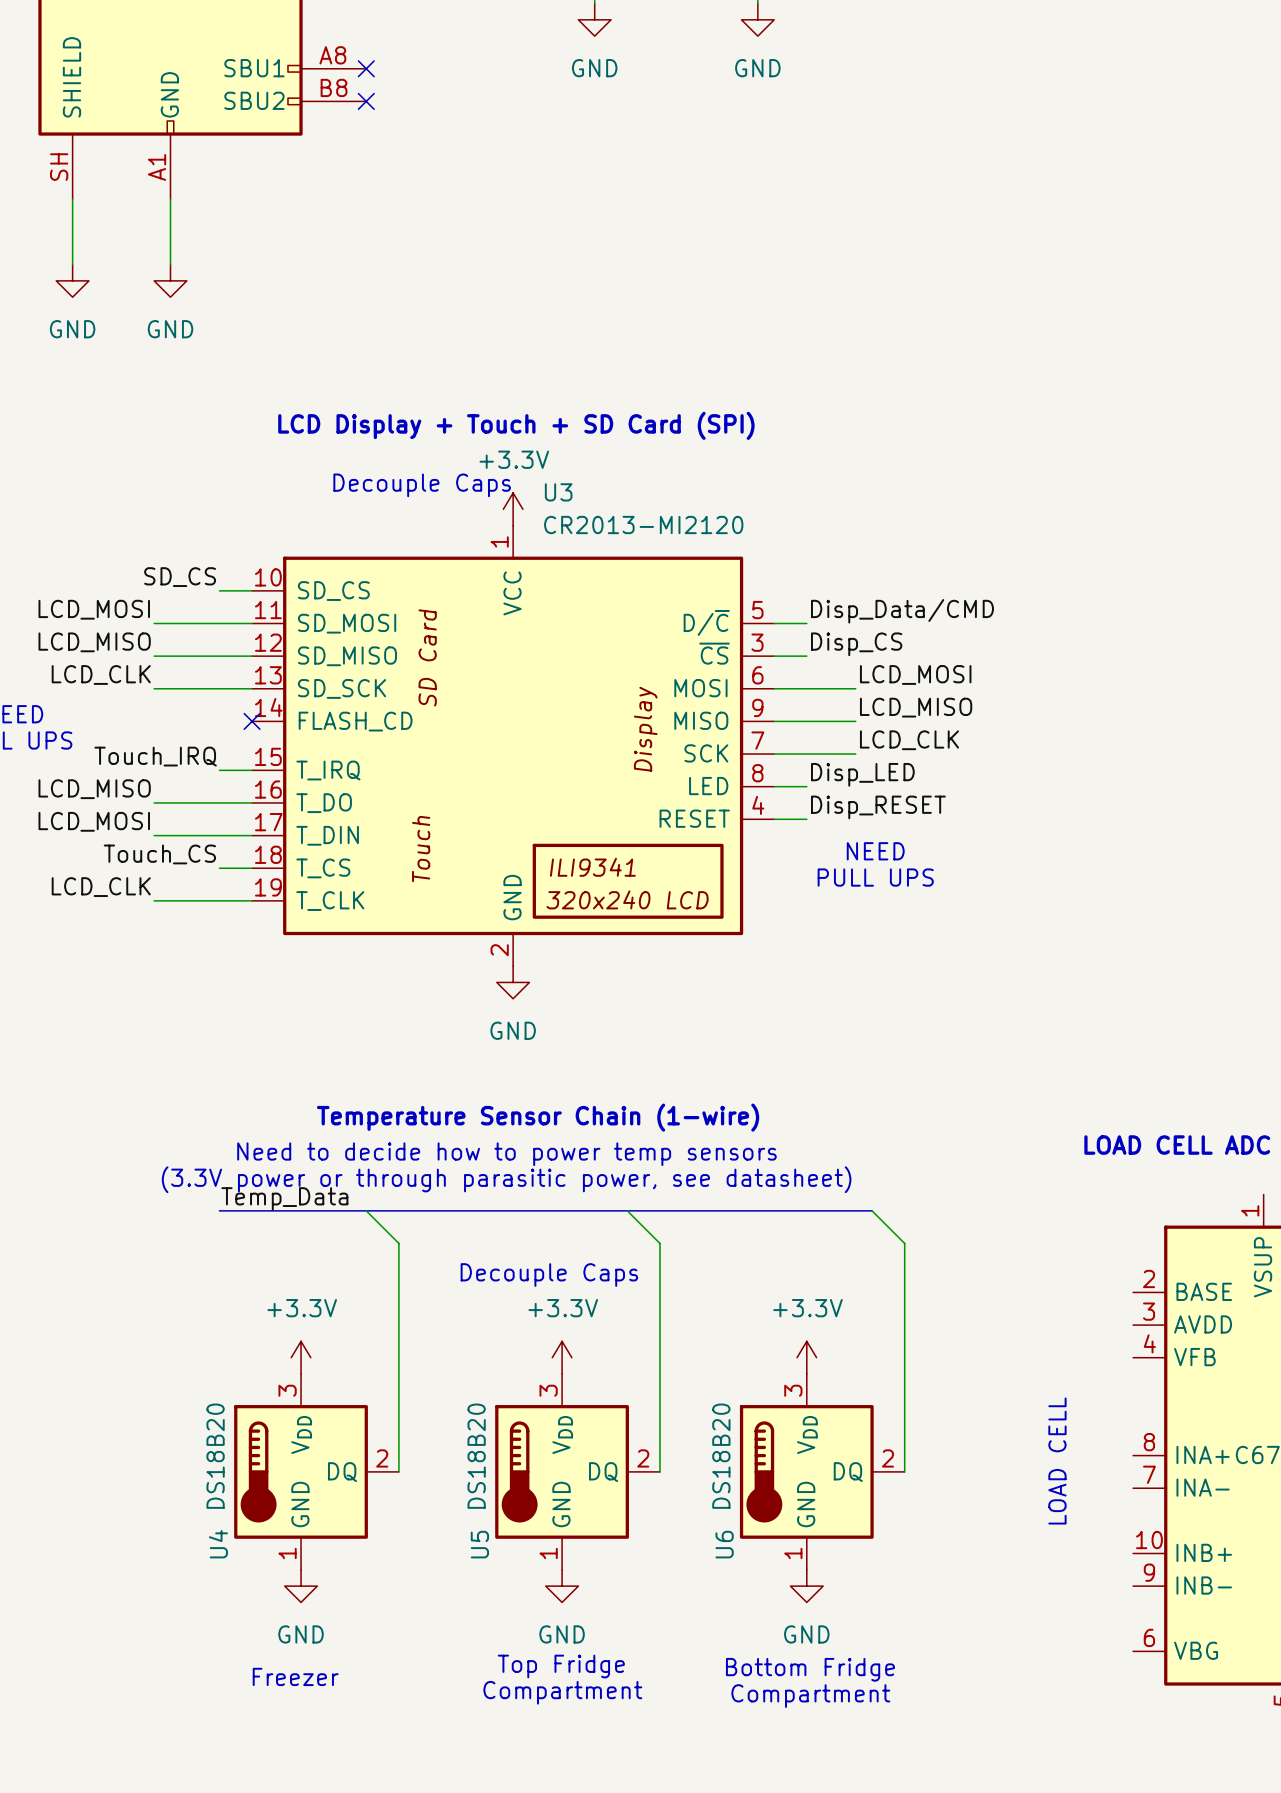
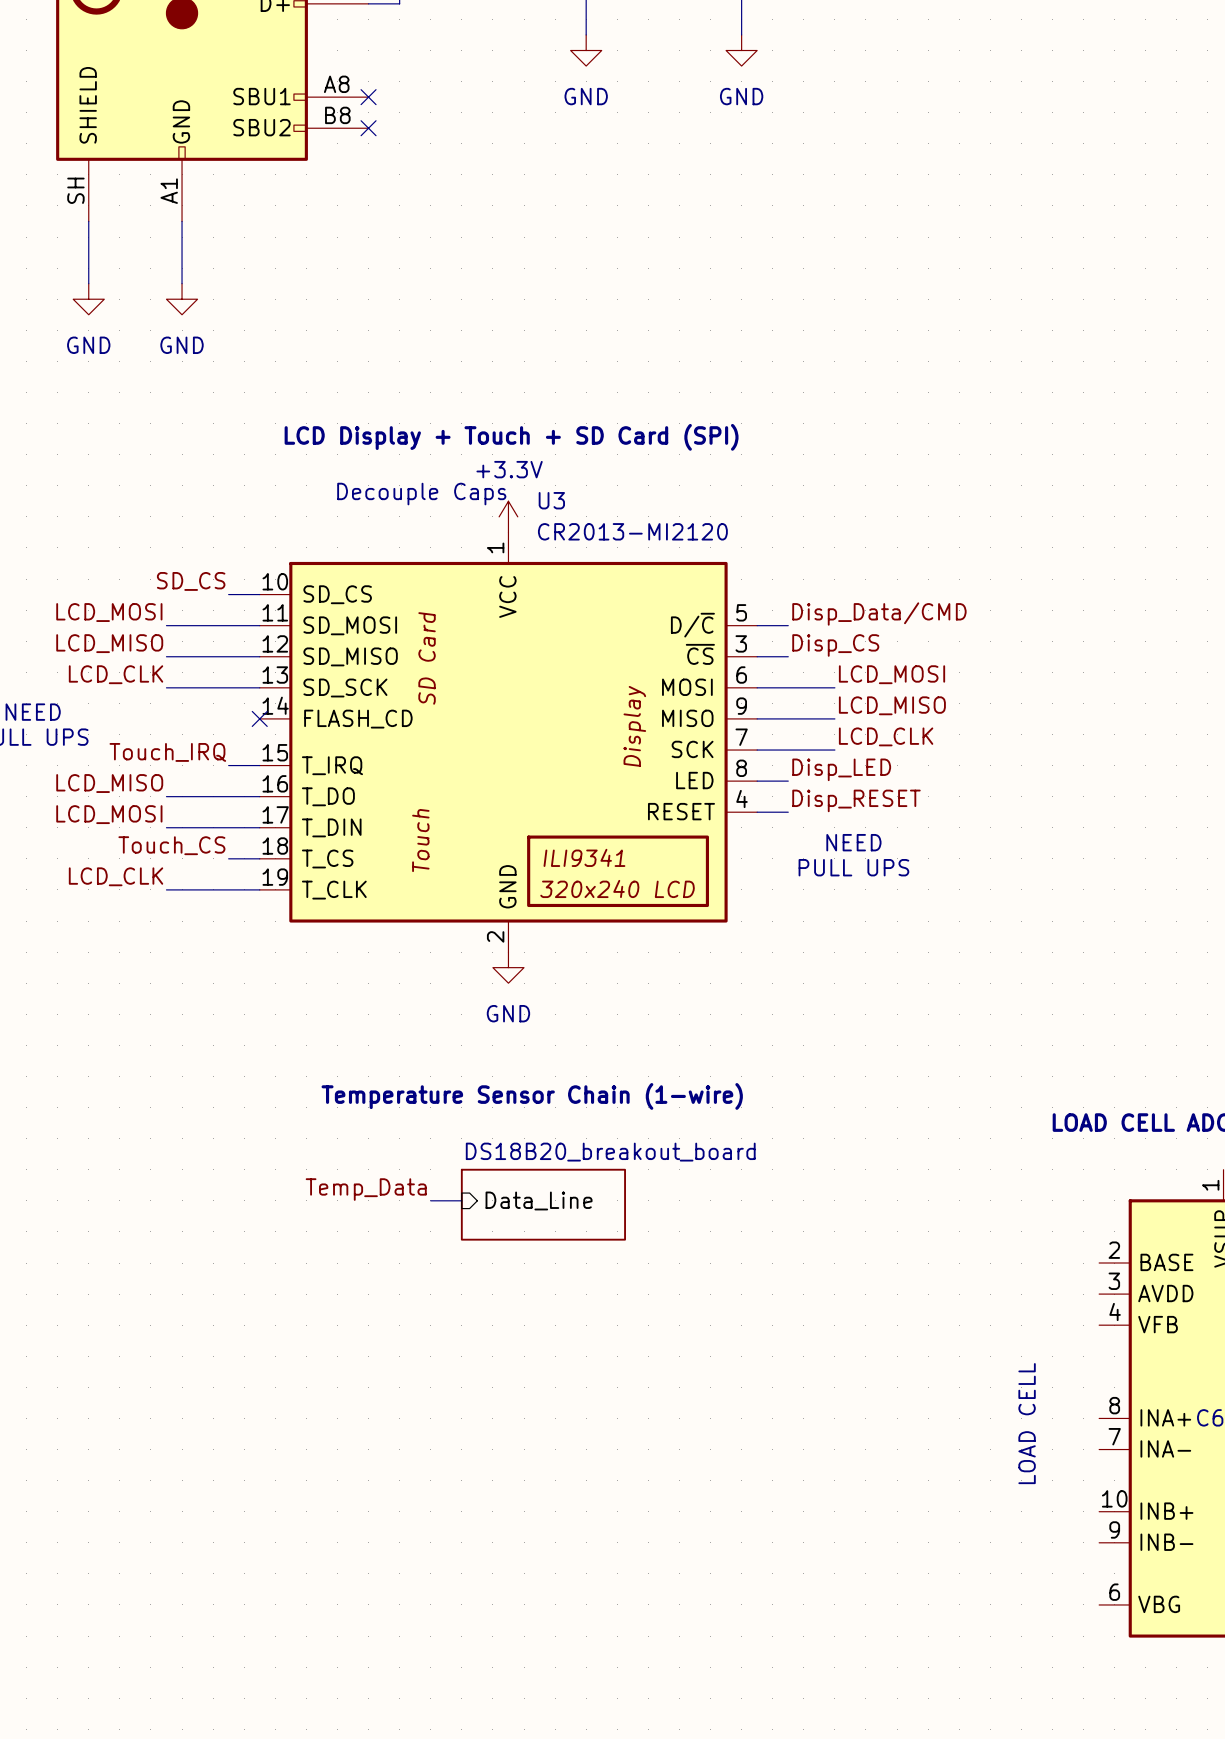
text: Need to decide how to power temp sensors (506, 1154) -> none
text: (3.3V power or through parasitic power, see datasheet) (506, 1179) -> none
label position: Temp_Data (284, 1199) -> Temp_Data (366, 1189)
bus: (219, 1210) (872, 1210) -> none
wire: (366, 1210) (398, 1243) (398, 1471) -> none
wire: (627, 1210) (659, 1243) (659, 1471) -> none
wire: (872, 1210) (904, 1243) (904, 1471) -> none
wire: none -> (430, 1200) (461, 1200)
sheet pin: none -> Data_Line (539, 1200)
sheet DS18B20_breakout_board: none -> (543, 1204)
text: Decouple Caps (549, 1275) -> none
power symbol: +3.3V (301, 1357) -> none
power symbol: +3.3V (562, 1357) -> none
power symbol: +3.3V (806, 1357) -> none
U4: DS18B20 (316, 1471) -> none
U5: DS18B20 (577, 1471) -> none
U6: DS18B20 (822, 1471) -> none
power symbol: GND (301, 1586) -> none
power symbol: GND (562, 1586) -> none
power symbol: GND (806, 1586) -> none
text: Top Fridge (561, 1666) -> none
text: Bottom Fridge (810, 1669) -> none
text: Freezer (295, 1676) -> none
text: Compartment (562, 1692) -> none
text: Compartment (810, 1696) -> none

